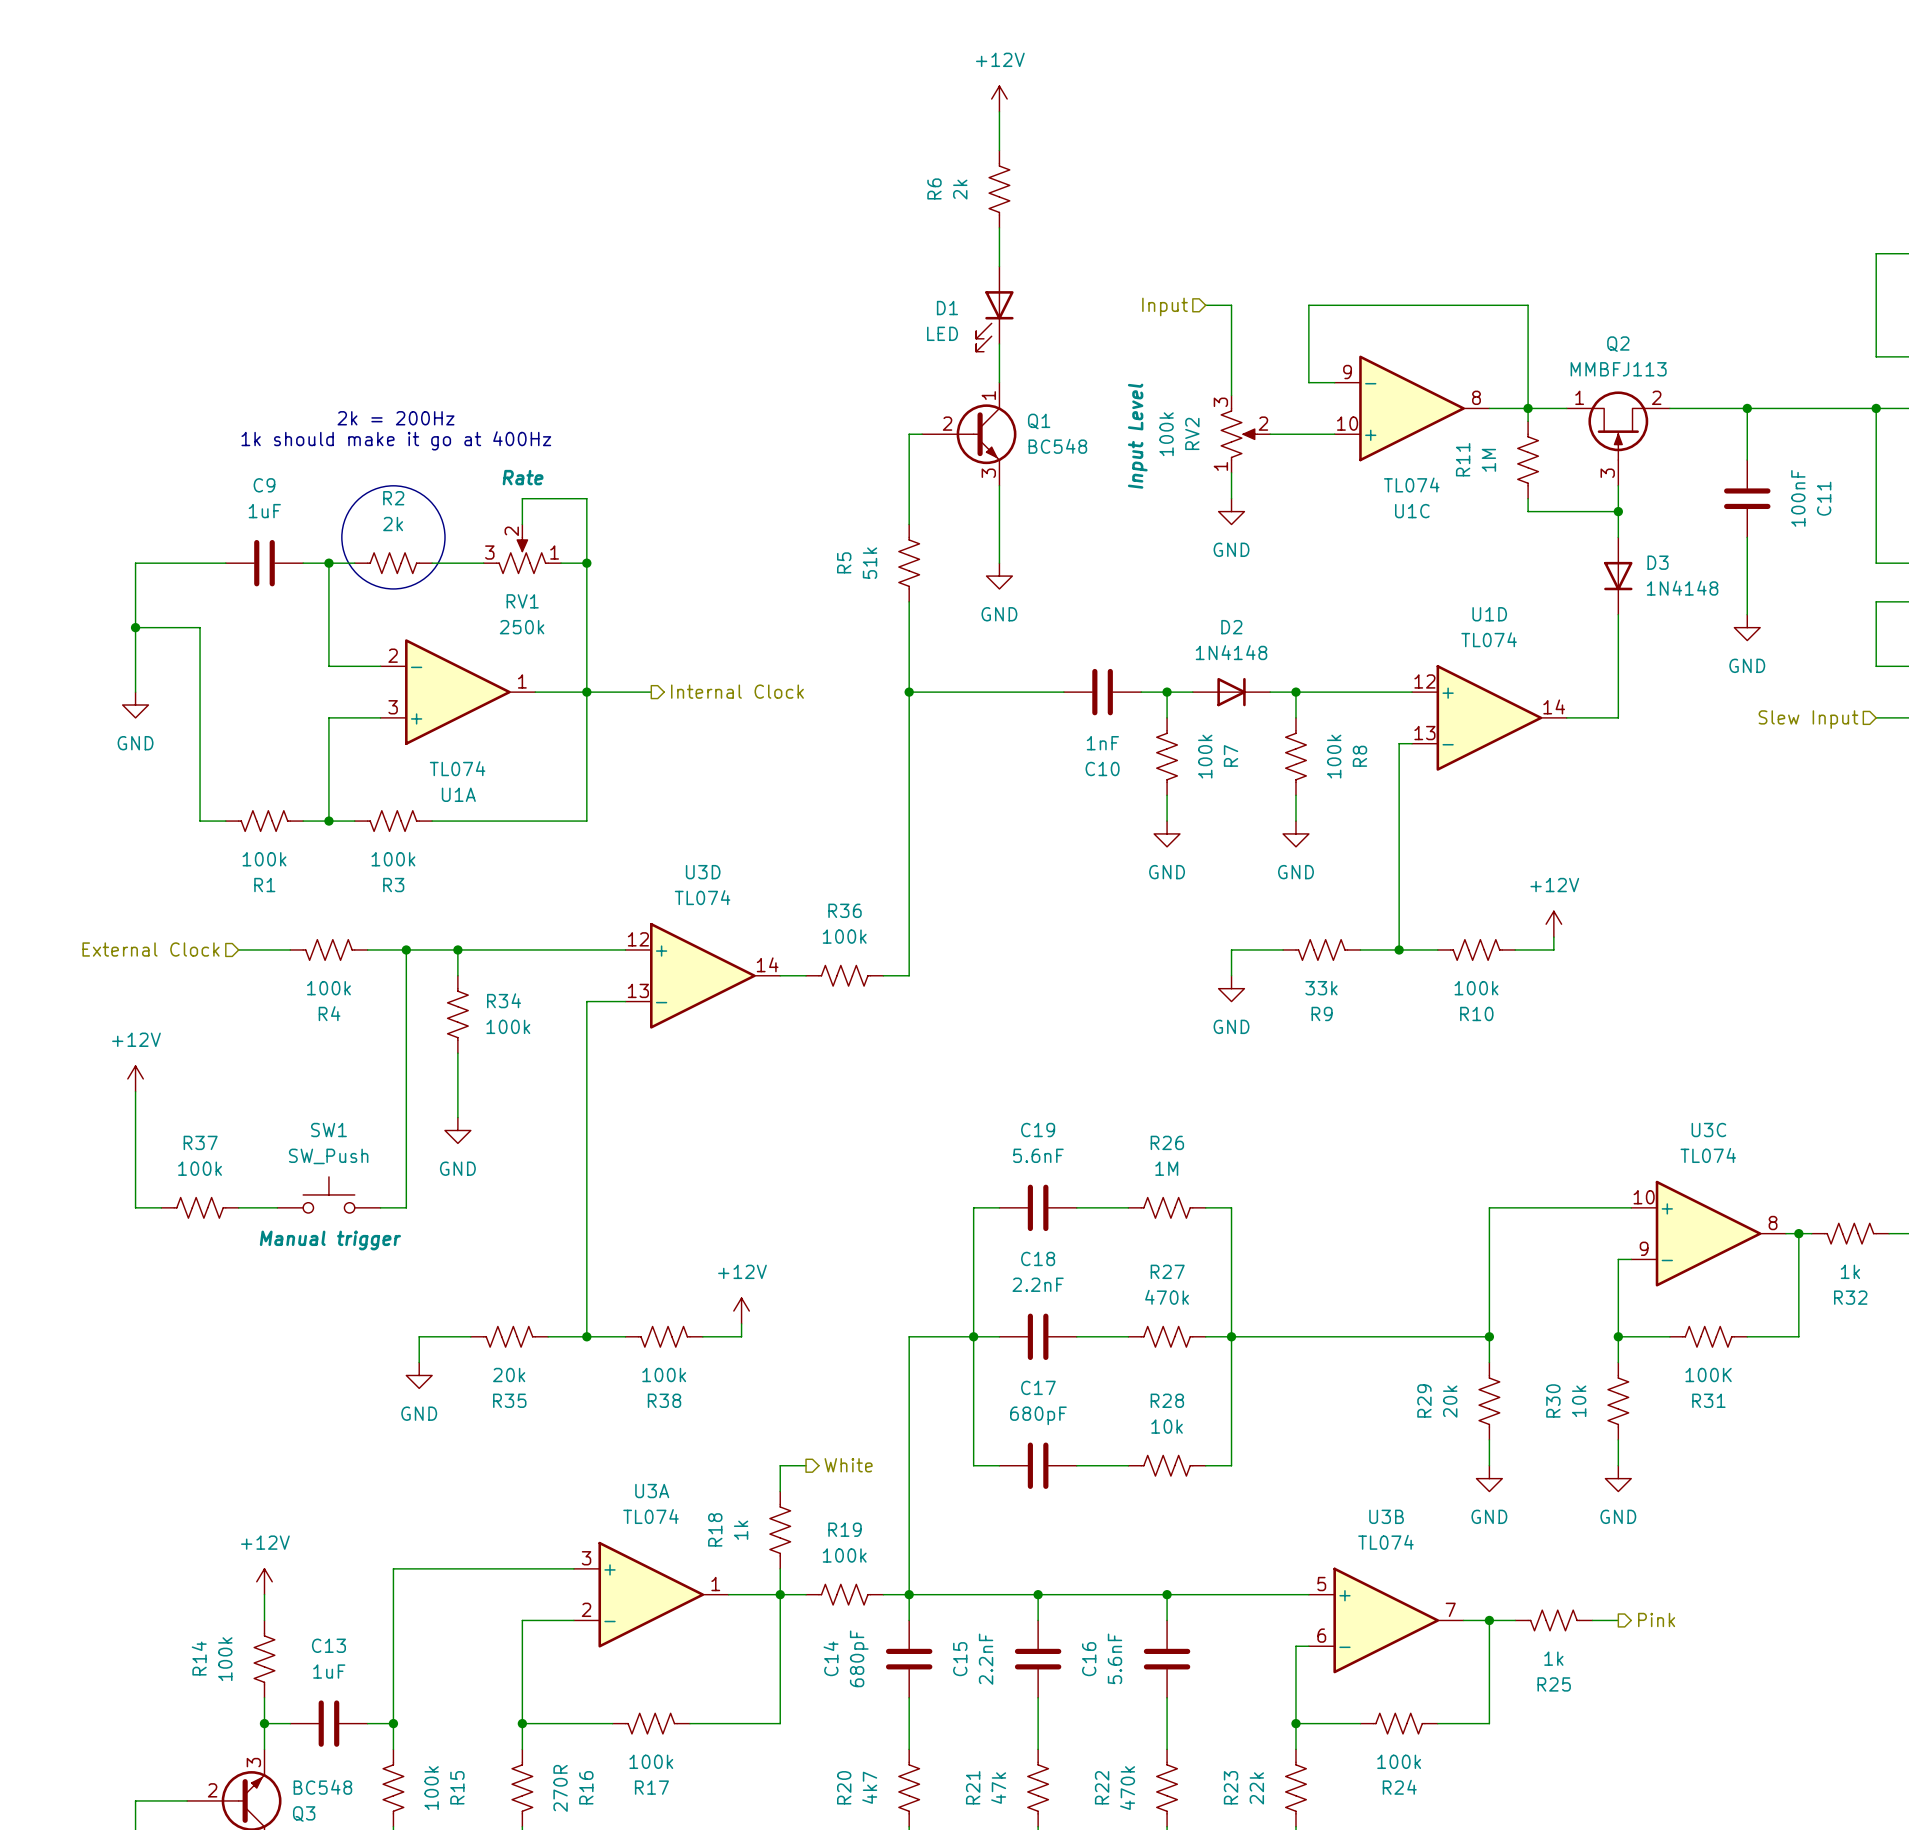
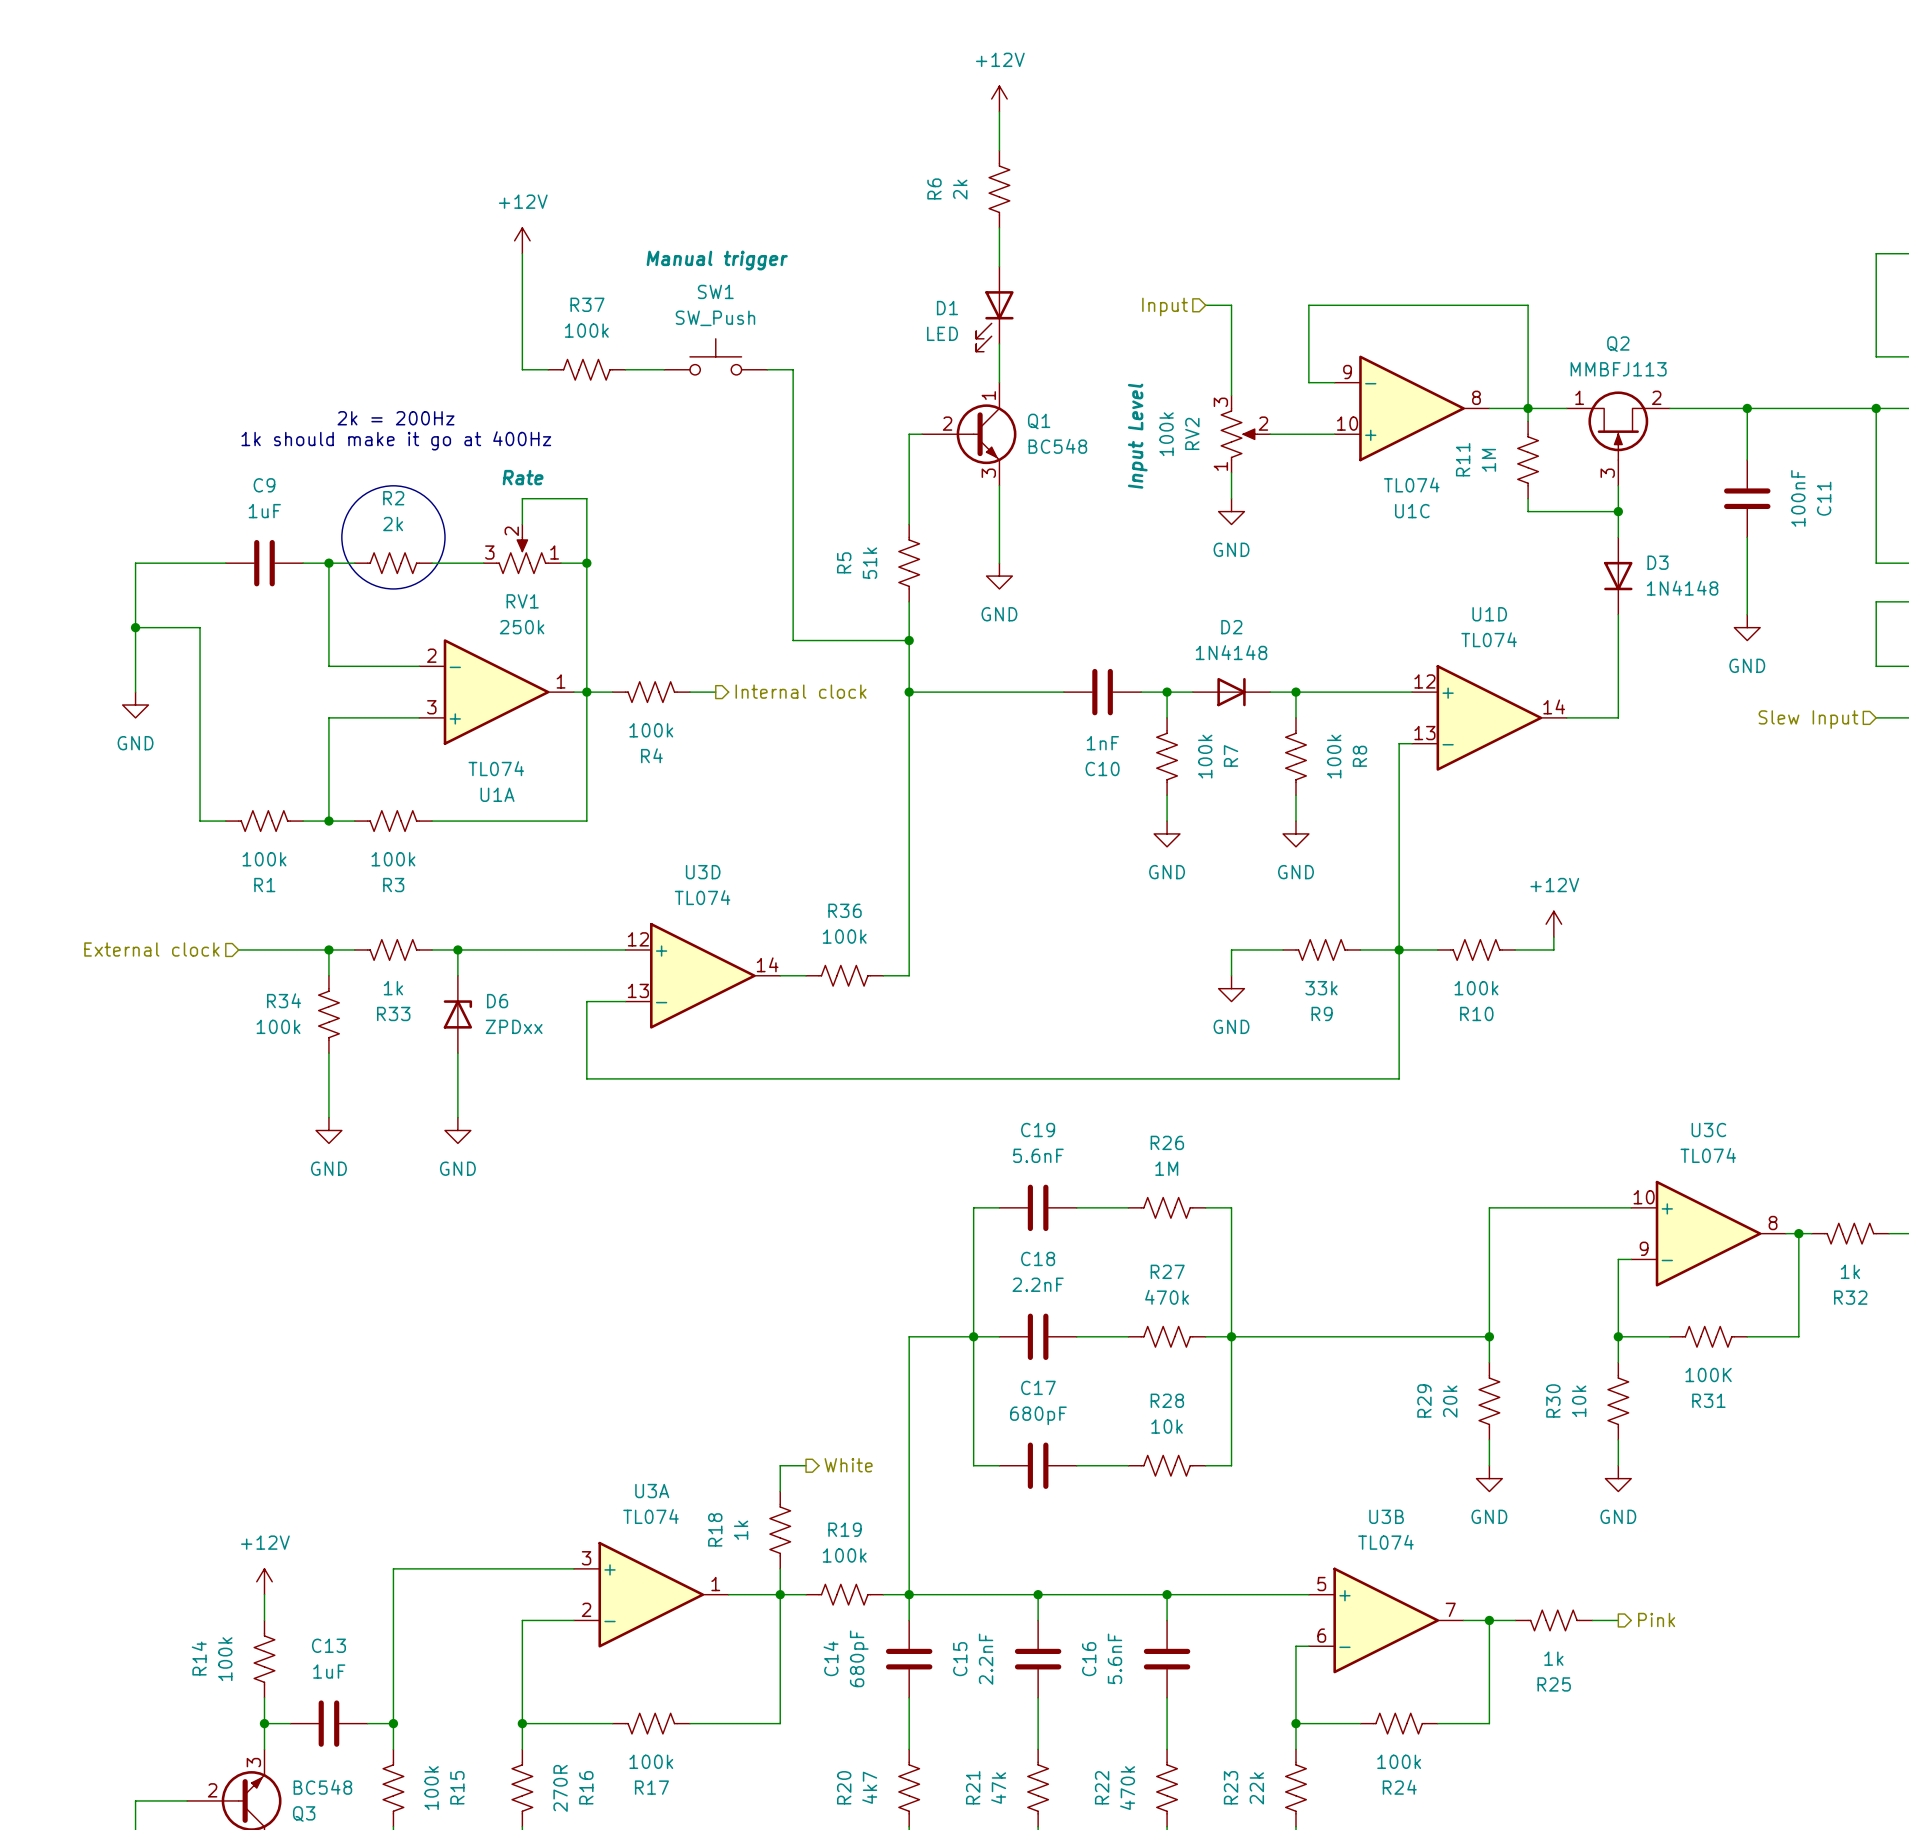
power symbol: none -> +12V (522, 240)
wire: none -> (522, 253) (522, 369) (548, 369)
wire: none -> (625, 369) (664, 369)
wire: none -> (767, 369) (793, 369) (793, 640) (909, 640)
junction: none -> (909, 640)
hierarchical label: Internal Clock (737, 691) -> Internal clock (801, 691)
U1A position: (457, 692) -> (496, 692)
wire: none -> (689, 692) (715, 692)
hierarchical label: External Clock (151, 949) -> External clock (151, 949)
wire: none -> (328, 949) (328, 975)
junction: none -> (328, 949)
R4 position: (328, 949) -> (651, 692)
wire: (367, 949) (432, 949) -> (290, 949) (354, 949)
R33: none -> 1k (393, 949)
wire: (406, 949) (406, 1207) (380, 1207) -> none
junction: (406, 949) -> none
R34 flip: as is (457, 1014) -> left-right (328, 1014)
R34 position: (457, 1014) -> (328, 1014)
D6: none -> ZPDxx (457, 1014)
wire: none -> (328, 1053) (328, 1117)
power symbol: +12V (135, 1078) -> none
wire: (586, 1078) (586, 1336) -> (586, 1078) (1399, 1078) (1399, 949)
wire: (135, 1091) (135, 1207) (161, 1207) -> none
power symbol: none -> GND (328, 1130)
SW1 position: (328, 1194) -> (715, 356)
R37 position: (200, 1207) -> (586, 369)
wire: (238, 1207) (277, 1207) -> none
SW1 text position: Manual trigger (330, 1240) -> Manual trigger (717, 260)
power symbol: +12V (741, 1311) -> none
wire: (741, 1323) (741, 1336) (702, 1336) -> none
wire: (470, 1336) (419, 1336) (419, 1362) -> none
R35: 20k (509, 1336) -> none
wire: (548, 1336) (625, 1336) -> none
junction: (586, 1336) -> none
R38: 100k (664, 1336) -> none
power symbol: GND (419, 1375) -> none

